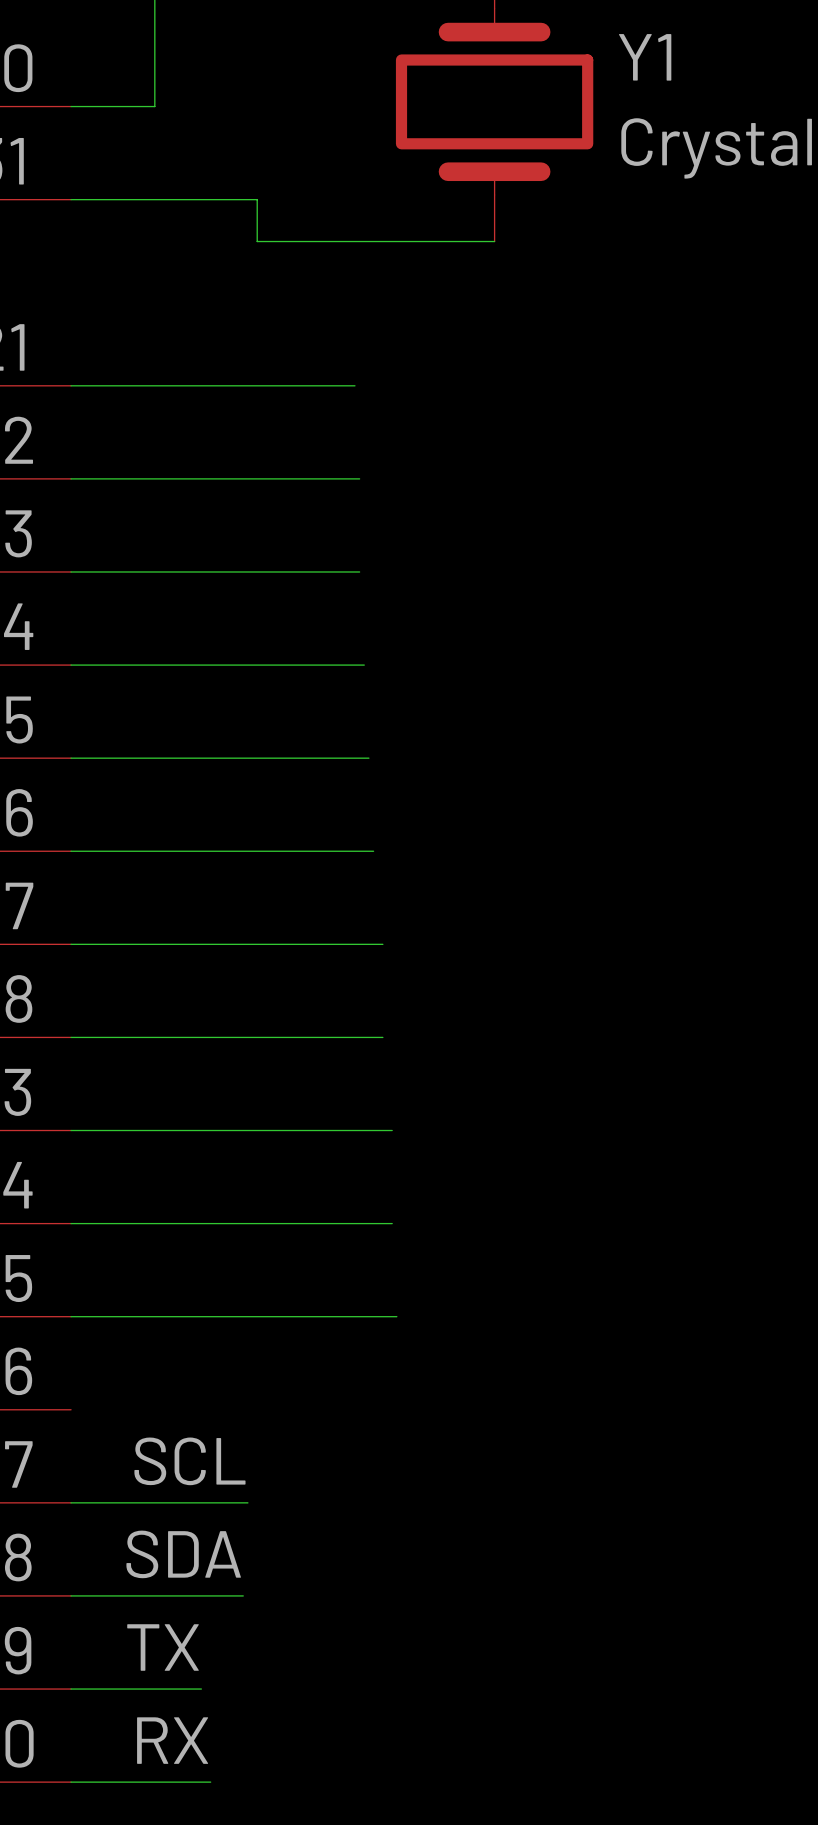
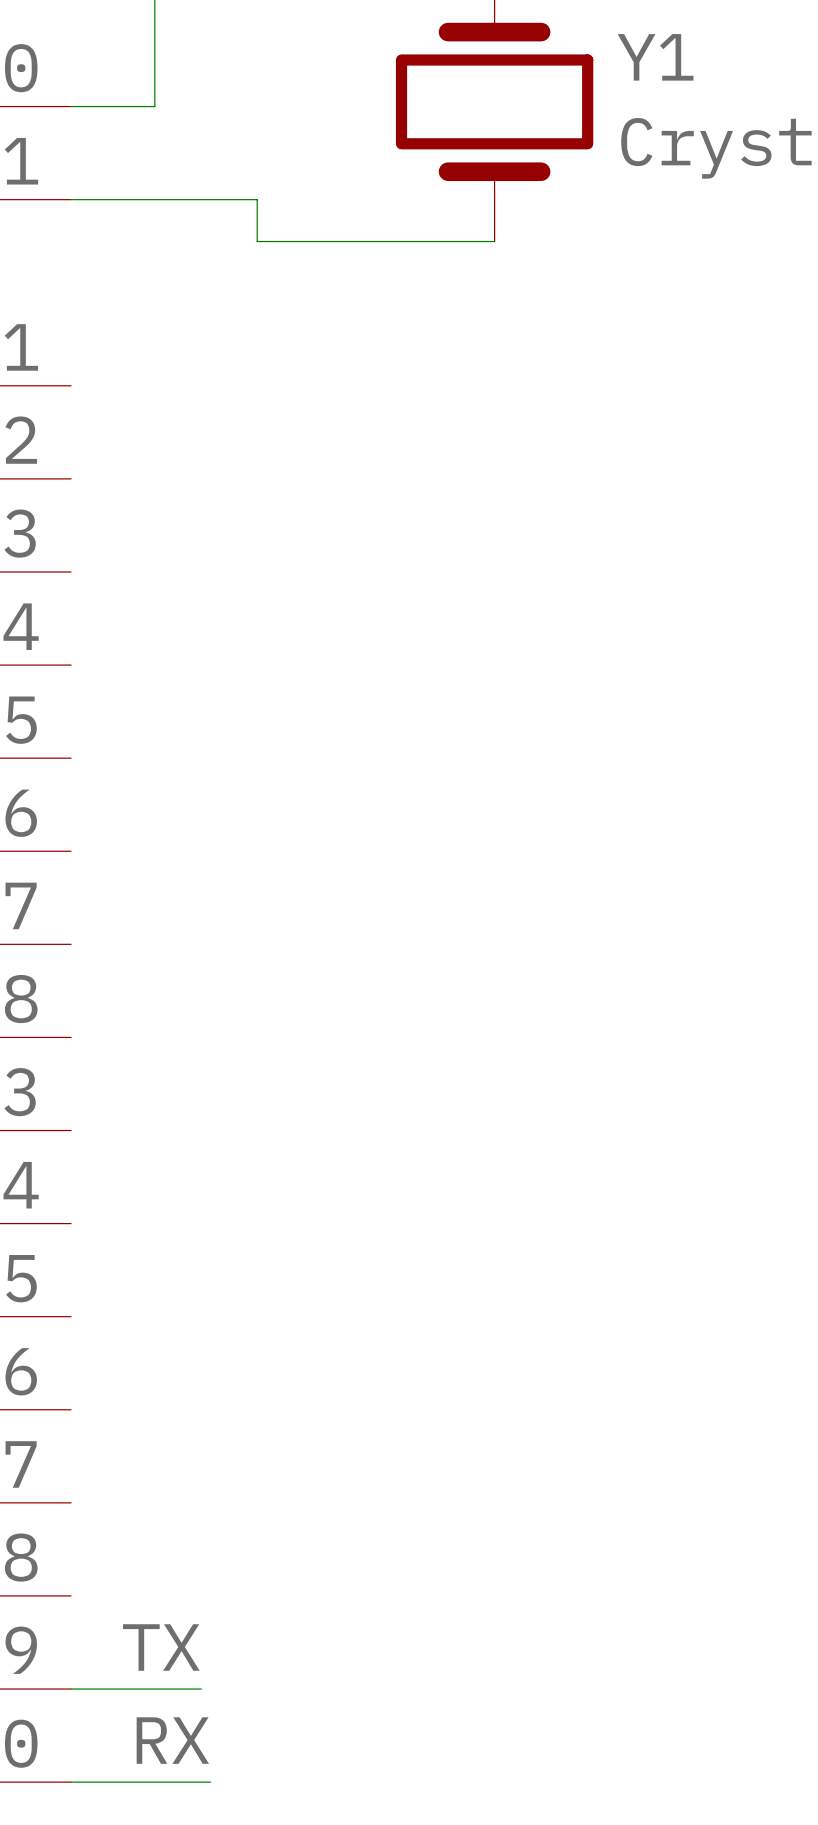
wire: (71, 385) (354, 385) -> none
wire: (71, 478) (359, 478) -> none
wire: (71, 571) (359, 571) -> none
wire: (71, 665) (364, 665) -> none
wire: (71, 758) (368, 758) -> none
wire: (71, 851) (373, 851) -> none
wire: (71, 944) (382, 944) -> none
wire: (71, 1037) (382, 1037) -> none
wire: (71, 1130) (392, 1130) -> none
wire: (71, 1223) (392, 1223) -> none
wire: (71, 1316) (396, 1316) -> none
label: SCL (189, 1461) -> none
wire: (71, 1502) (247, 1502) -> none
label: SDA (183, 1554) -> none
wire: (71, 1595) (243, 1595) -> none

